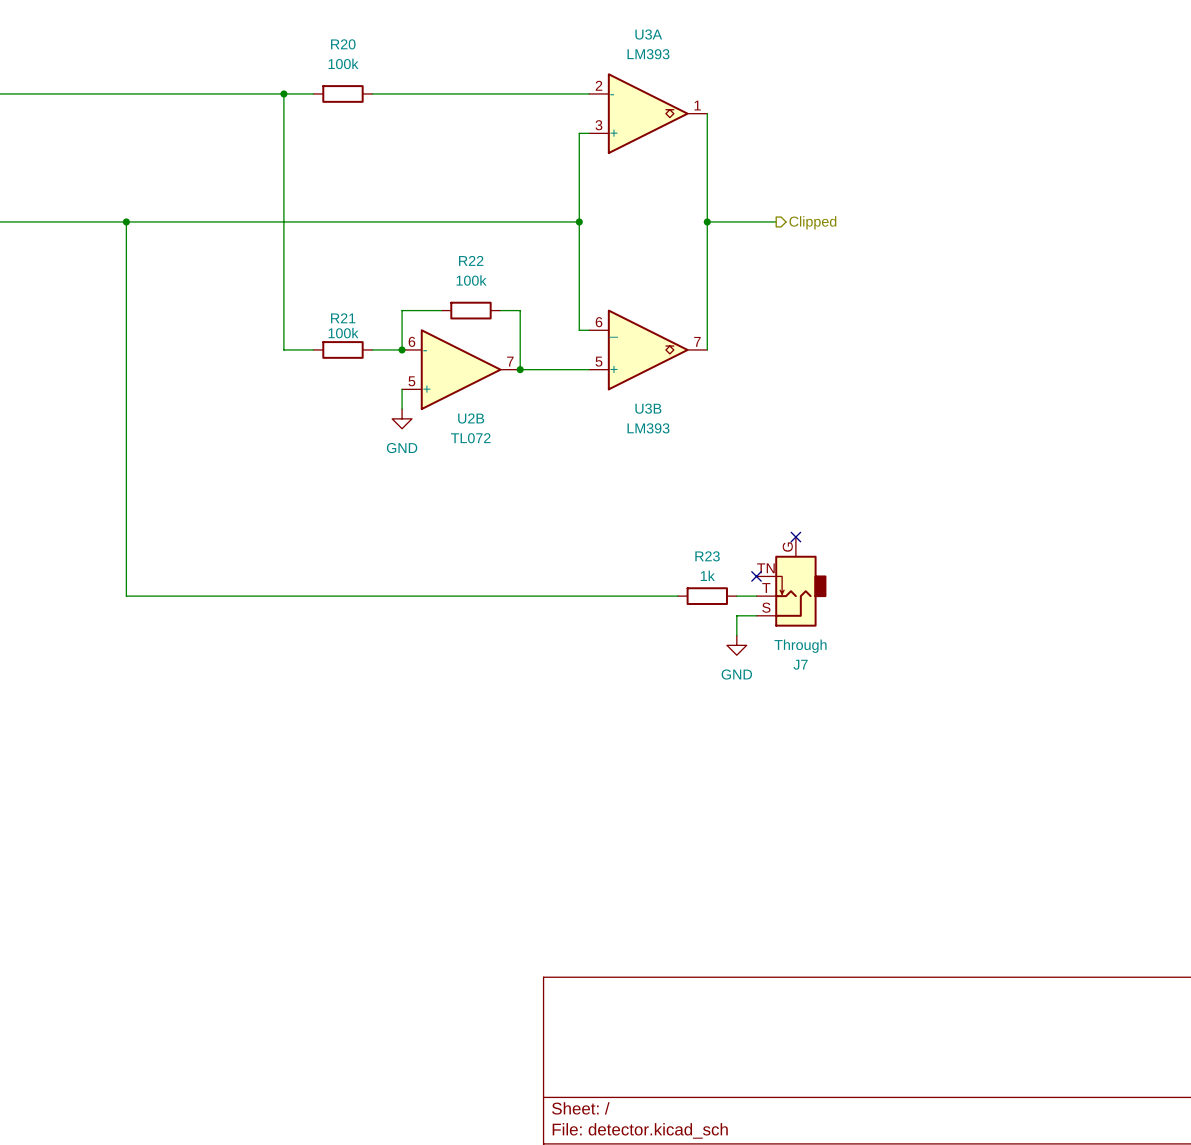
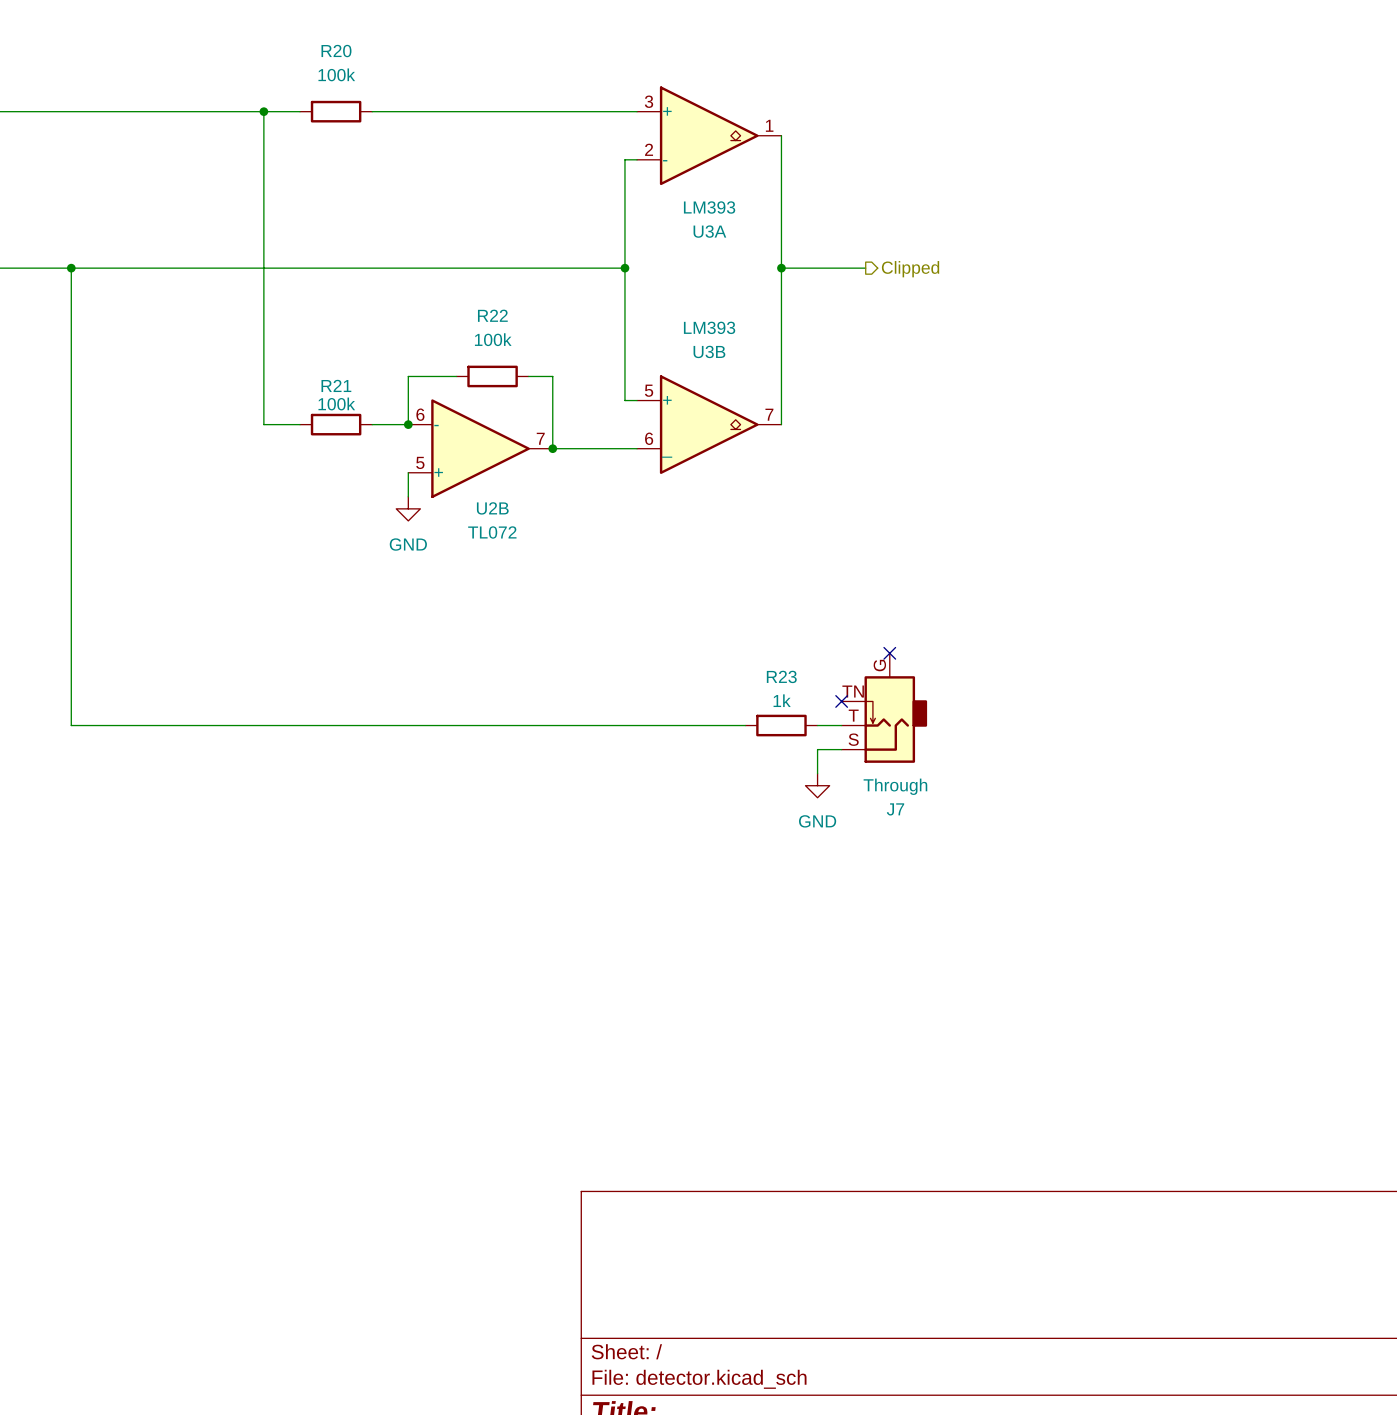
U3A flip: as is (648, 113) -> up-down (709, 135)
U3B flip: as is (648, 349) -> up-down (709, 424)

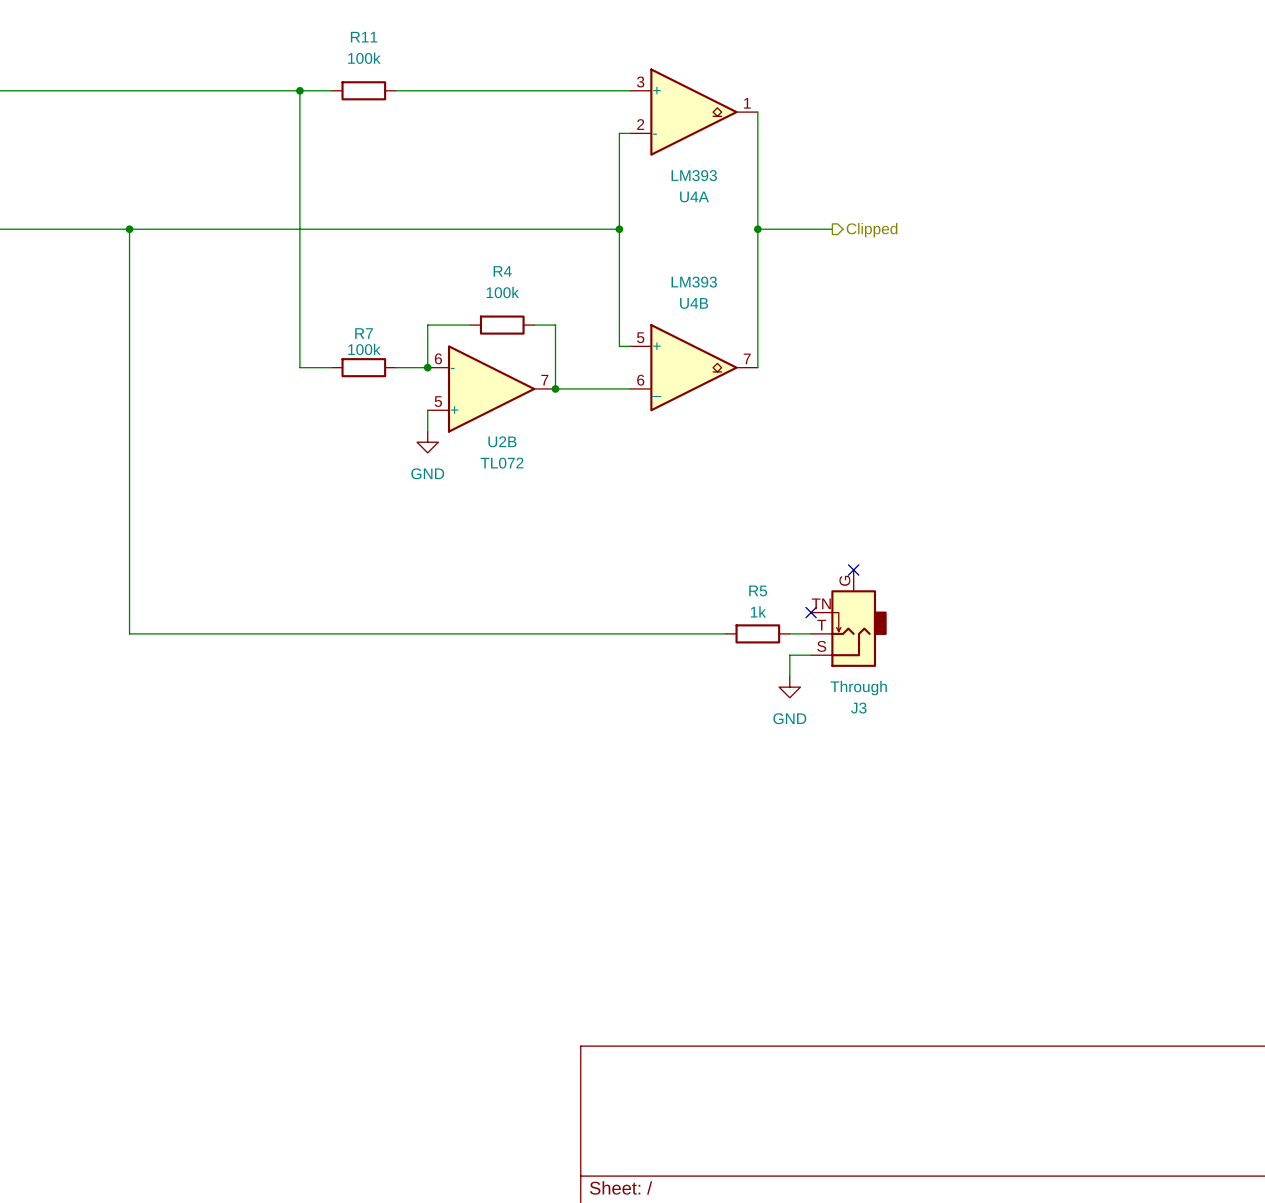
R20 name: R20 (336, 51) -> R11 (364, 37)
U3A name: U3A (709, 231) -> U4A (694, 196)
R22 name: R22 (492, 315) -> R4 (502, 271)
U3B name: U3B (709, 351) -> U4B (694, 303)
R21 name: R21 (336, 385) -> R7 (364, 333)
R23 name: R23 (781, 676) -> R5 (758, 590)
J7 name: J7 (895, 809) -> J3 (858, 708)

